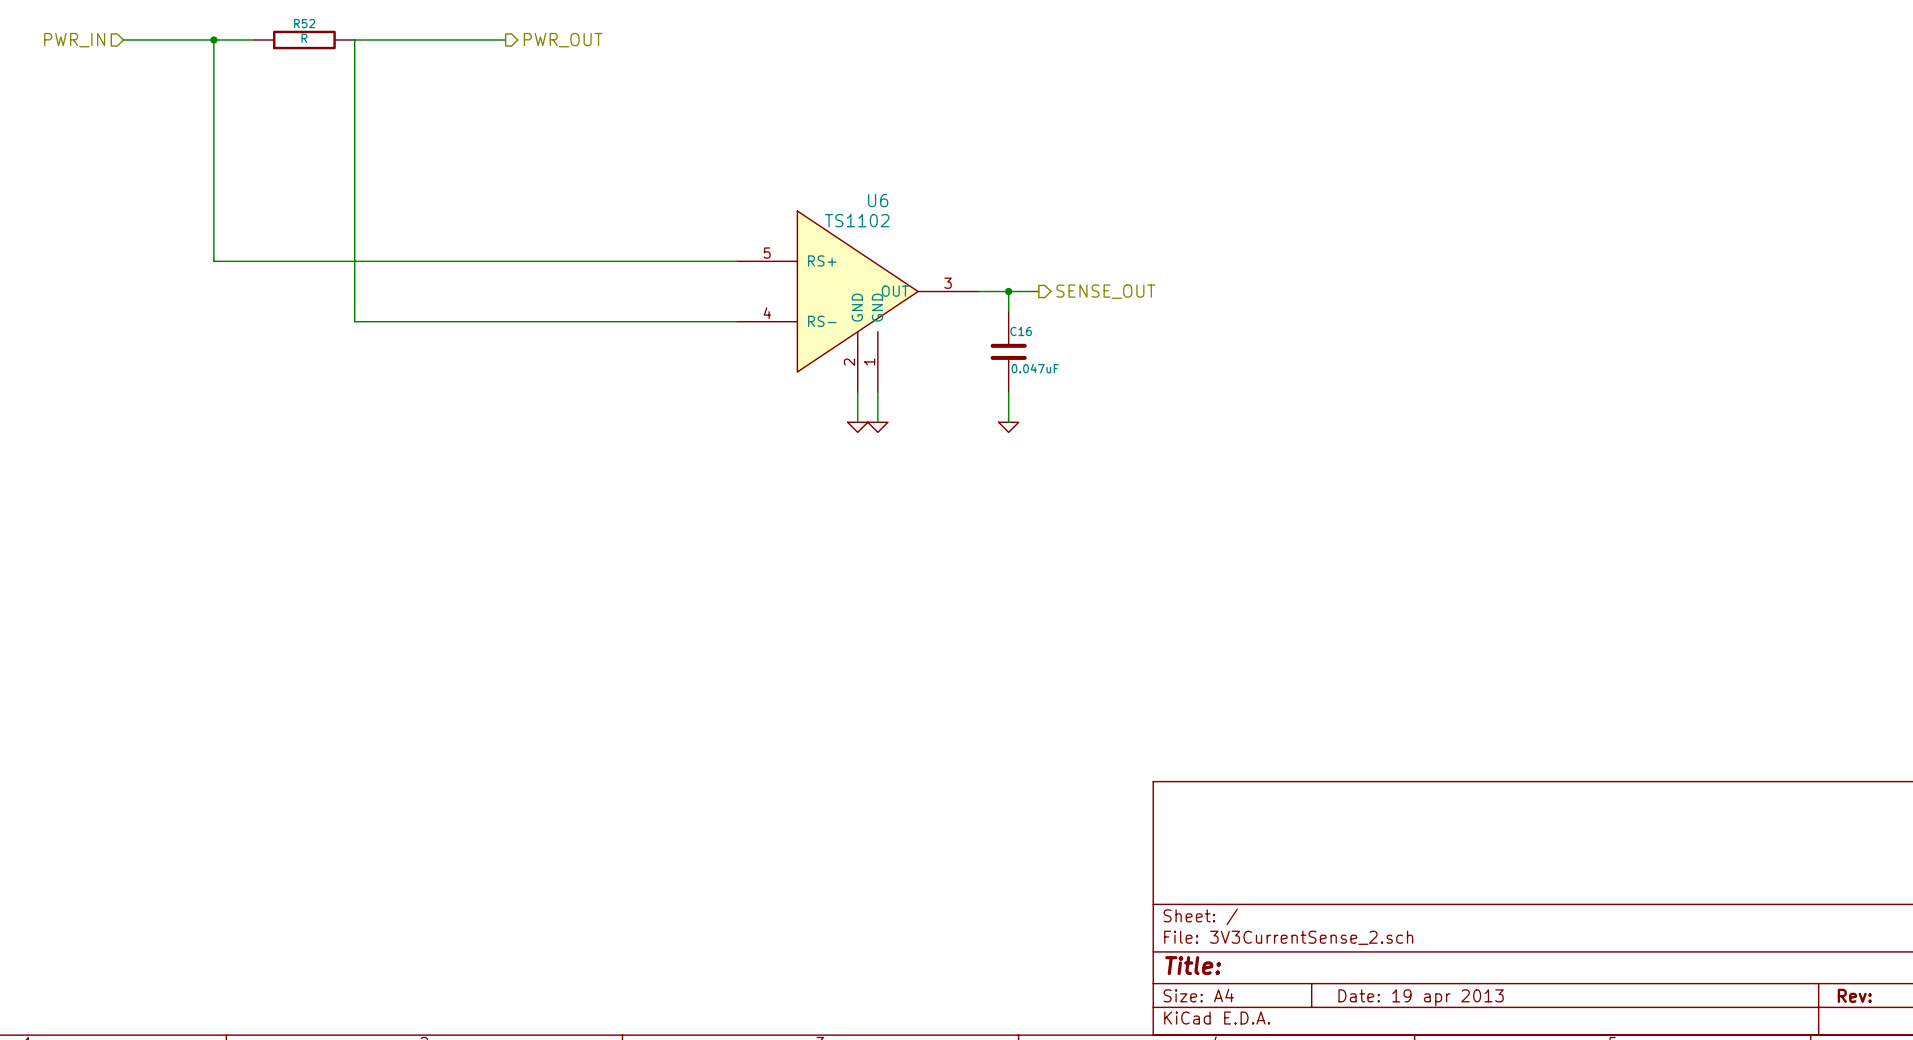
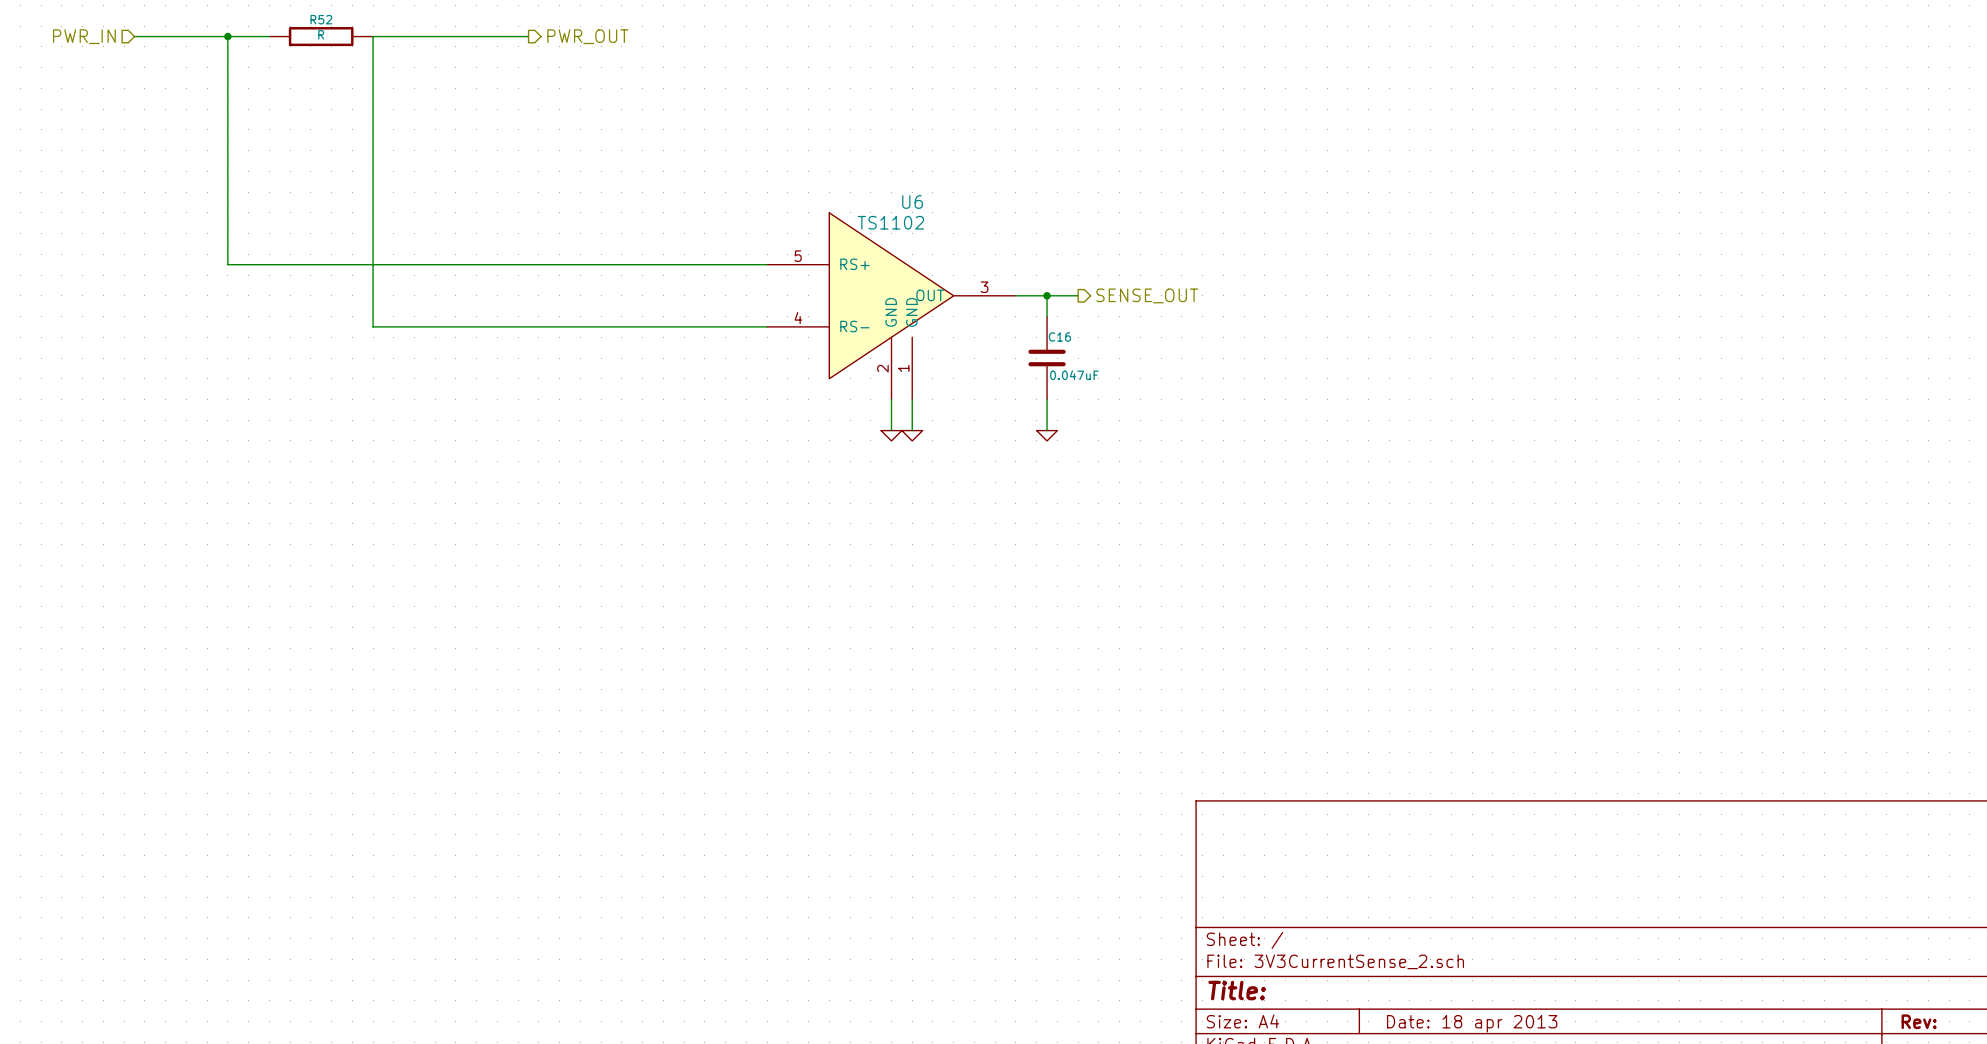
title block: Date: 19 apr 2013 (1421, 997) -> Date: 18 apr 2013 (1472, 1023)

